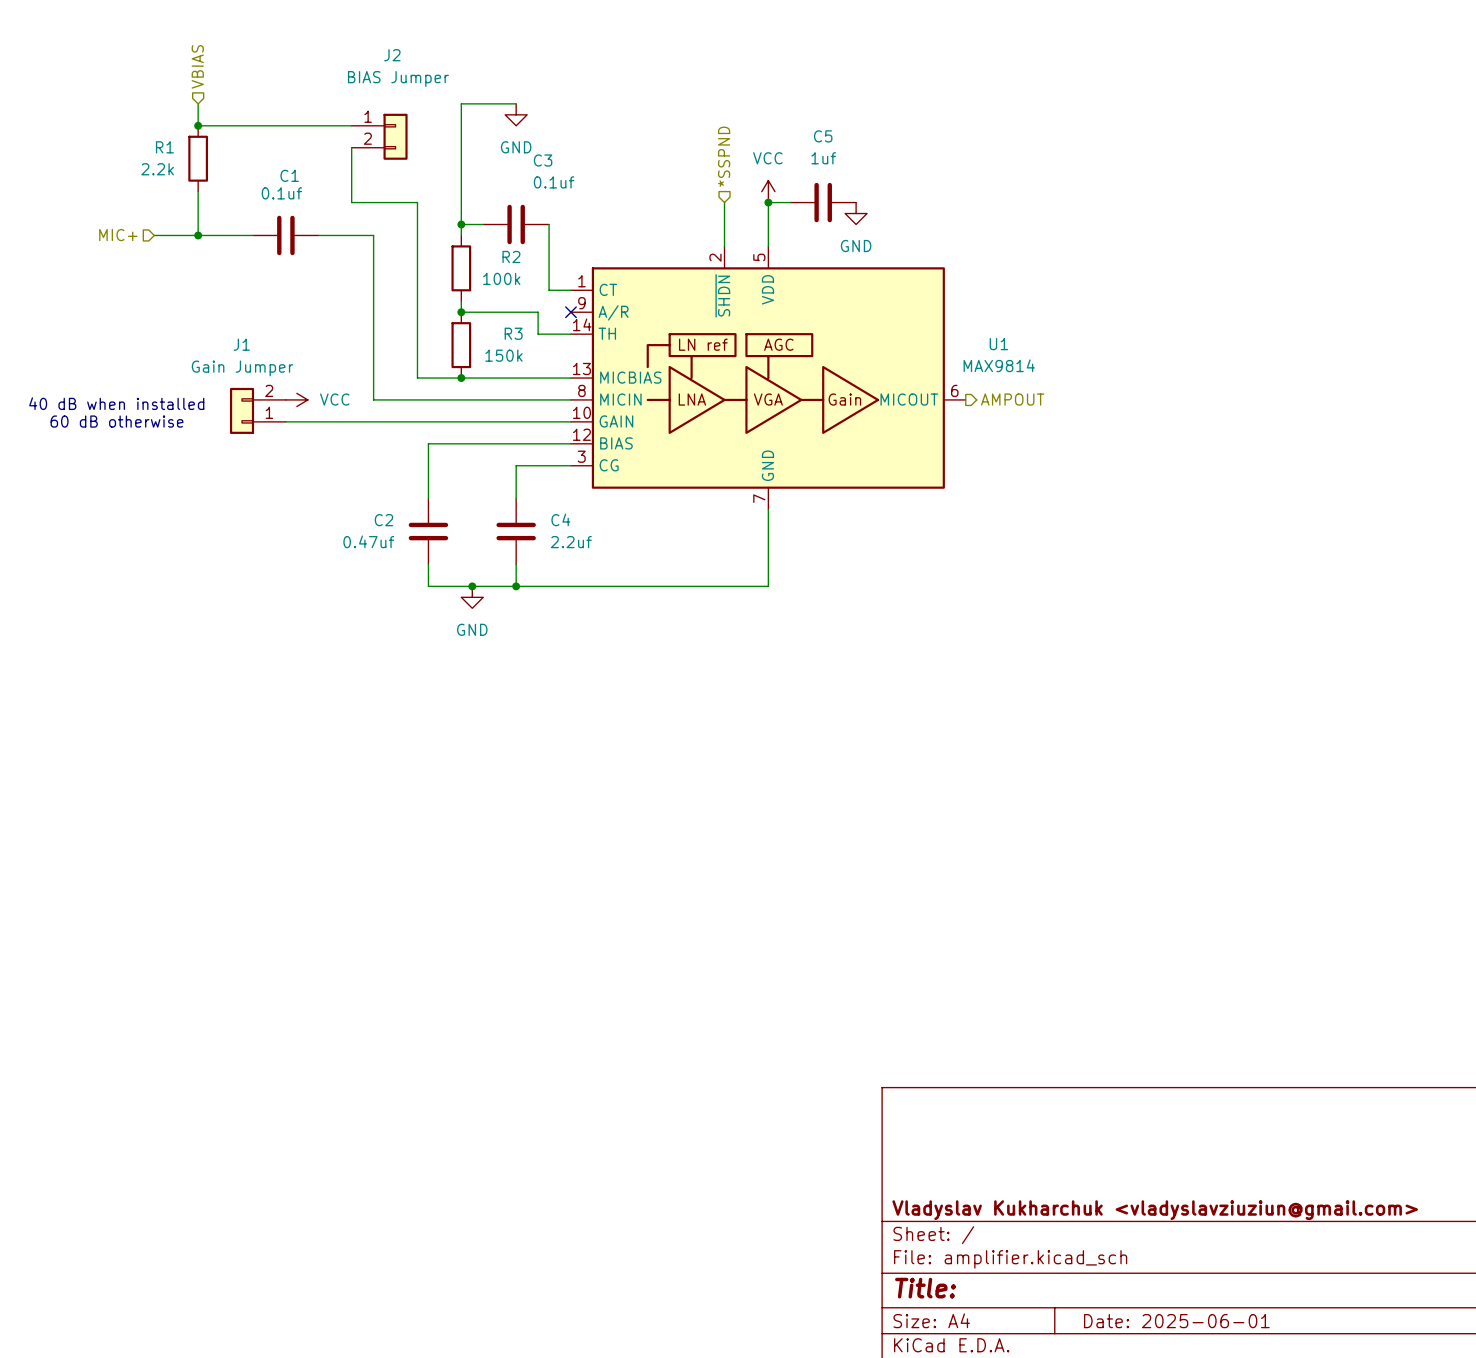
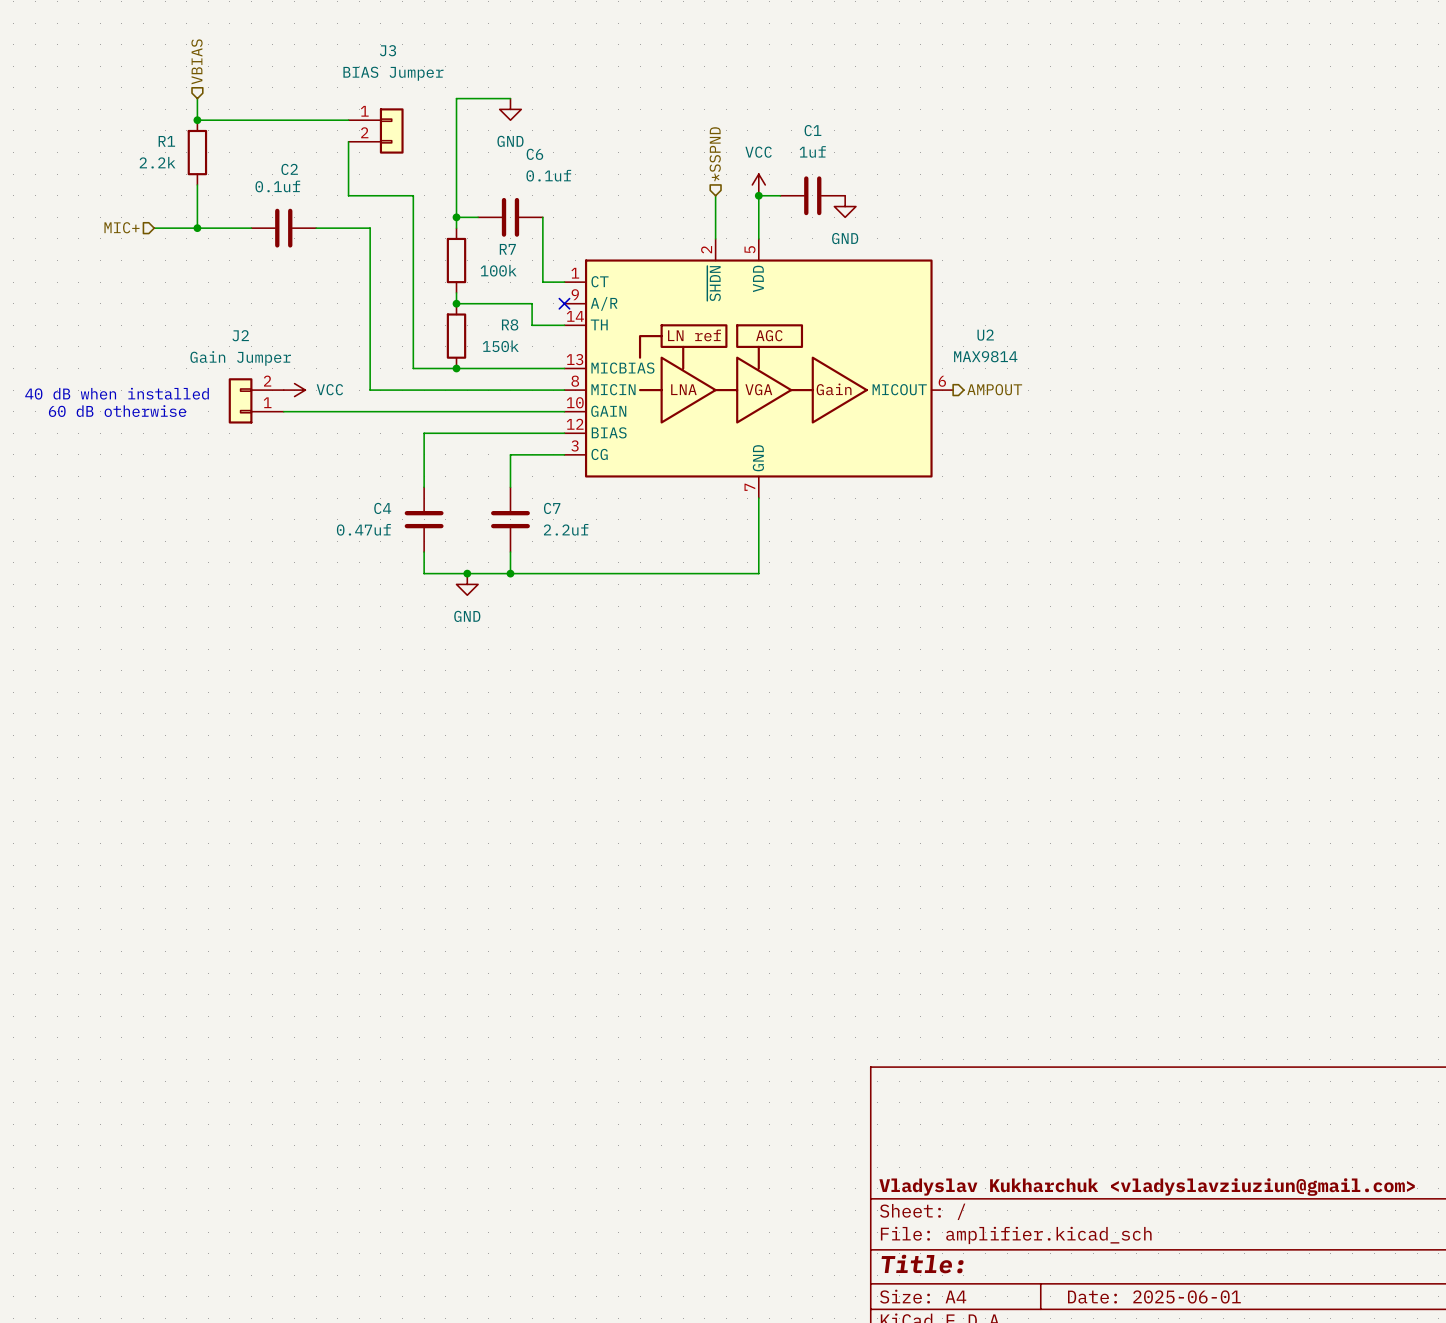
J2 name: J2 (392, 55) -> J3 (387, 50)
C5 name: C5 (823, 136) -> C1 (812, 130)
C3 name: C3 (543, 160) -> C6 (534, 154)
C1 name: C1 (289, 175) -> C2 (289, 169)
R2 name: R2 (511, 256) -> R7 (507, 249)
R3 name: R3 (513, 333) -> R8 (510, 324)
J1 name: J1 (241, 344) -> J2 (240, 335)
U1 name: U1 (998, 344) -> U2 (985, 335)
C4 name: C4 (560, 519) -> C7 (552, 508)
C2 name: C2 (383, 520) -> C4 (382, 508)

